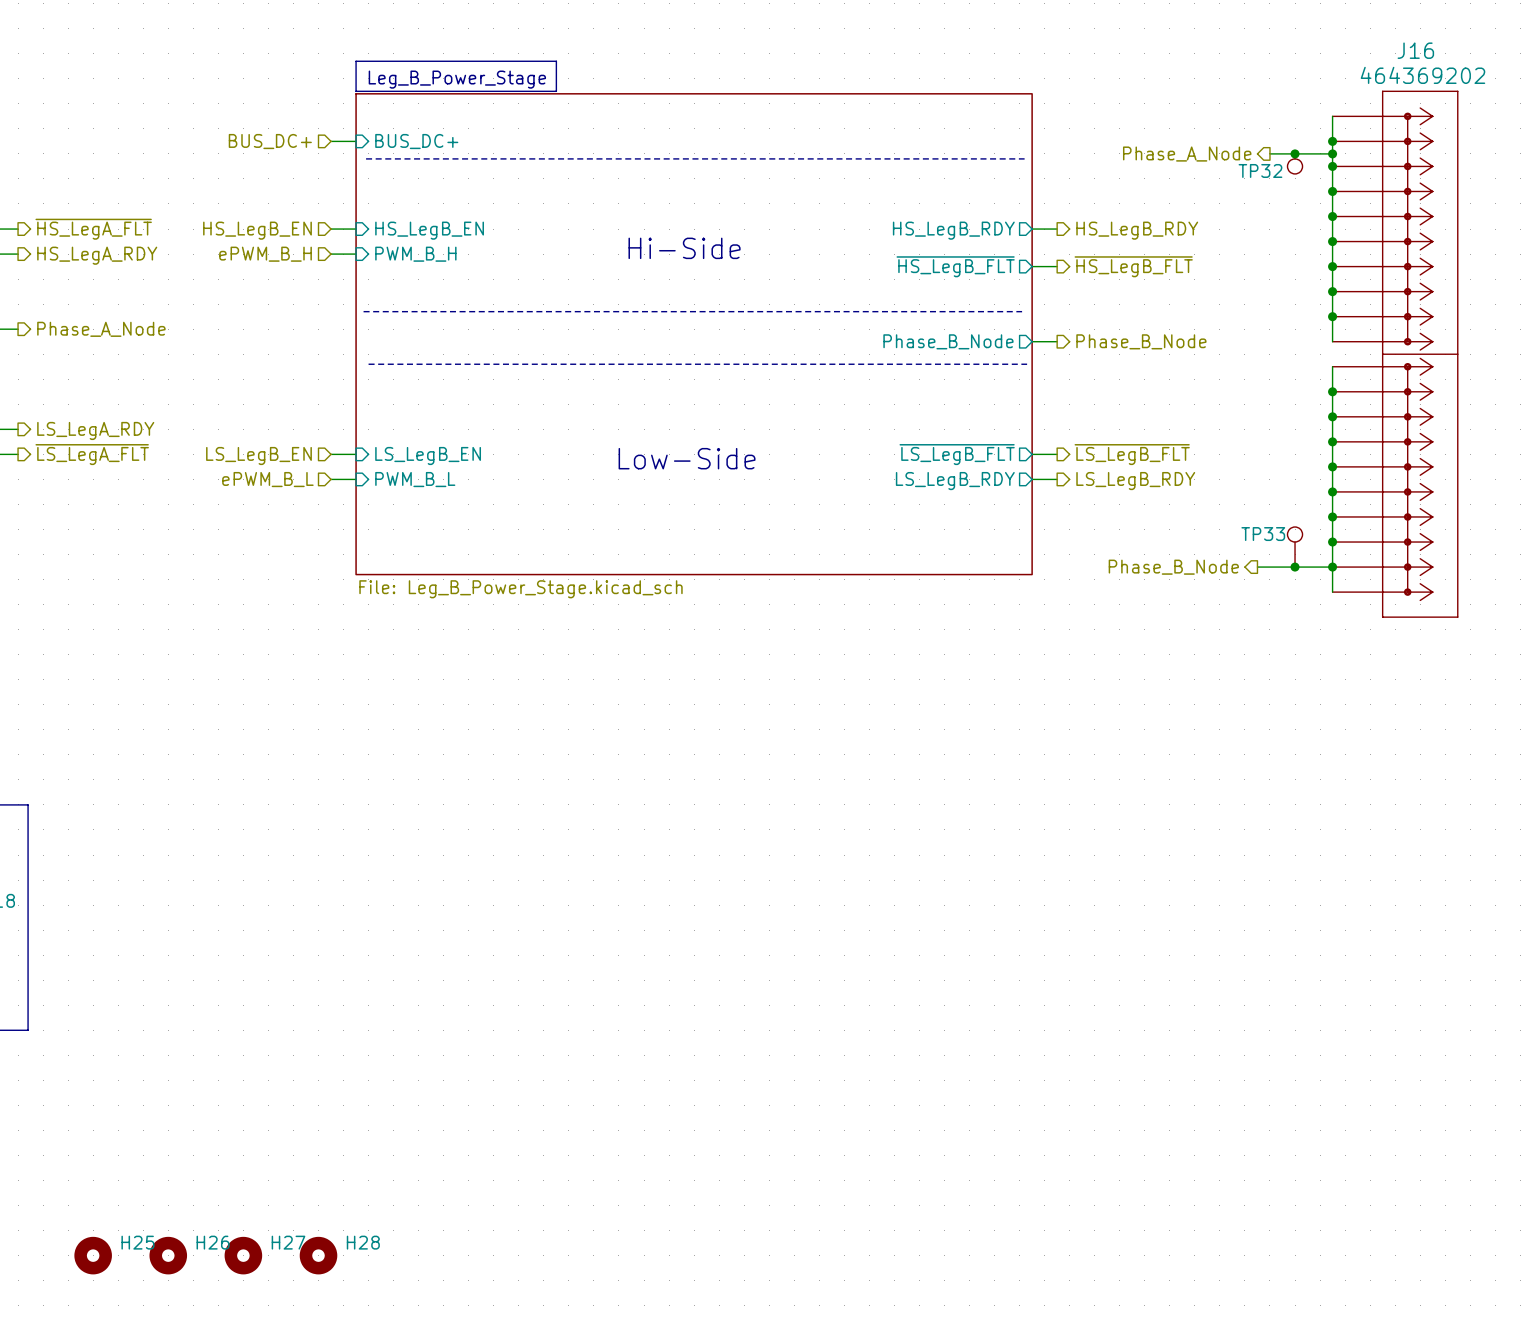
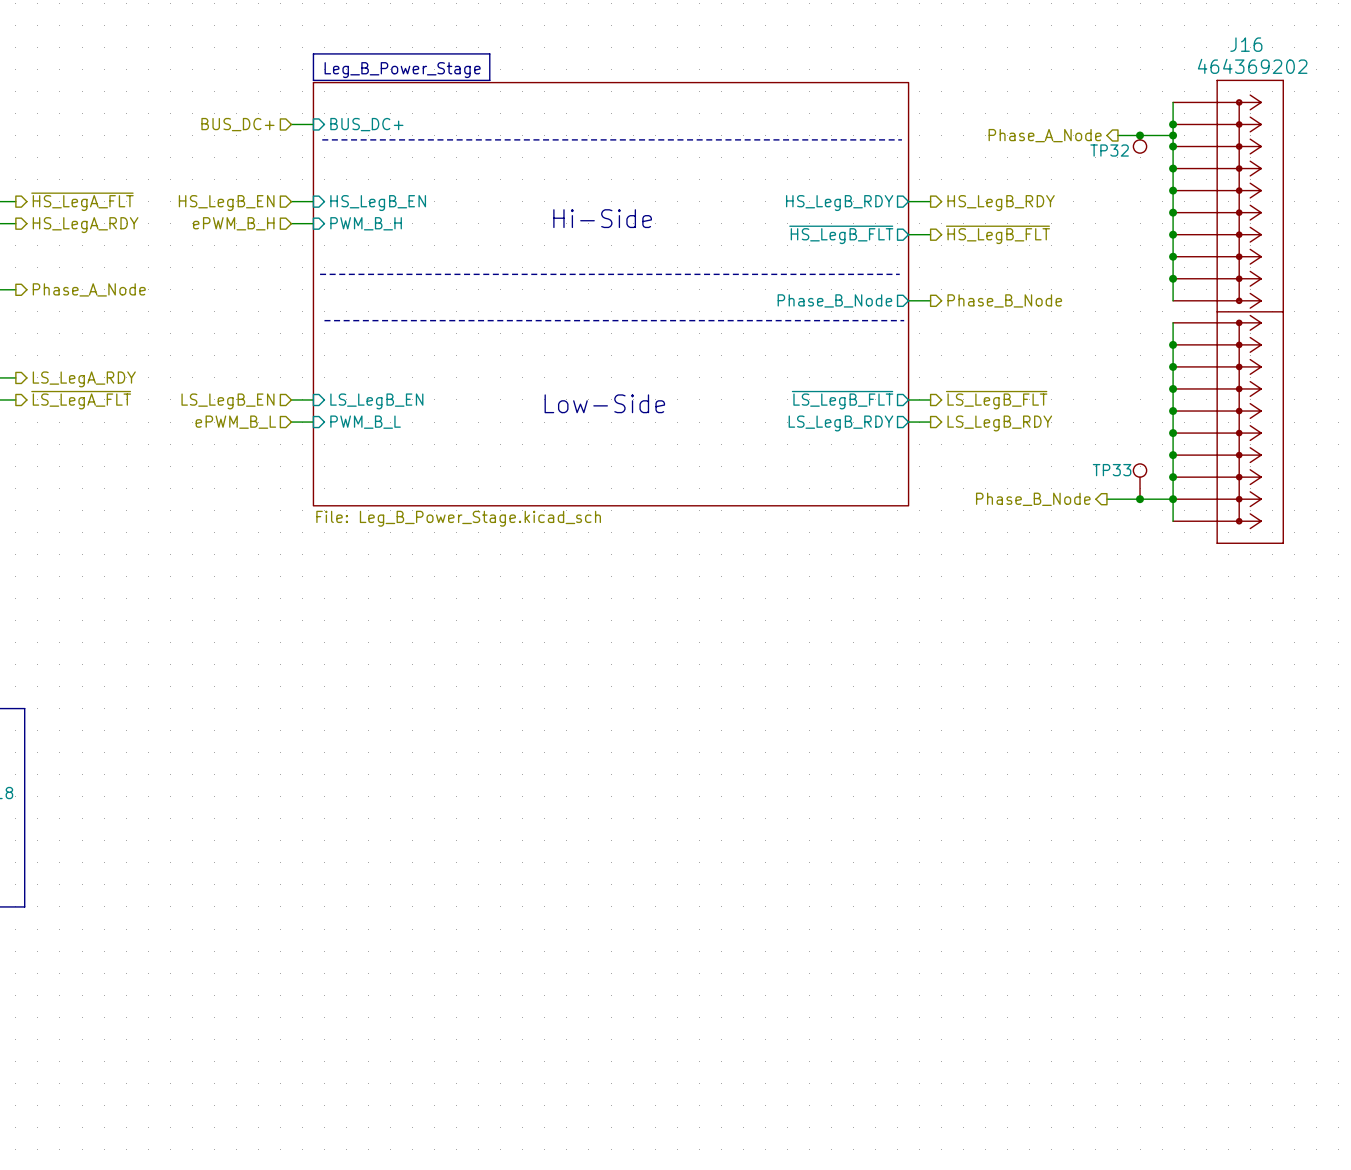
H25: (93, 1255) -> none
H26: (168, 1255) -> none
H27: (243, 1255) -> none
H28: (318, 1255) -> none

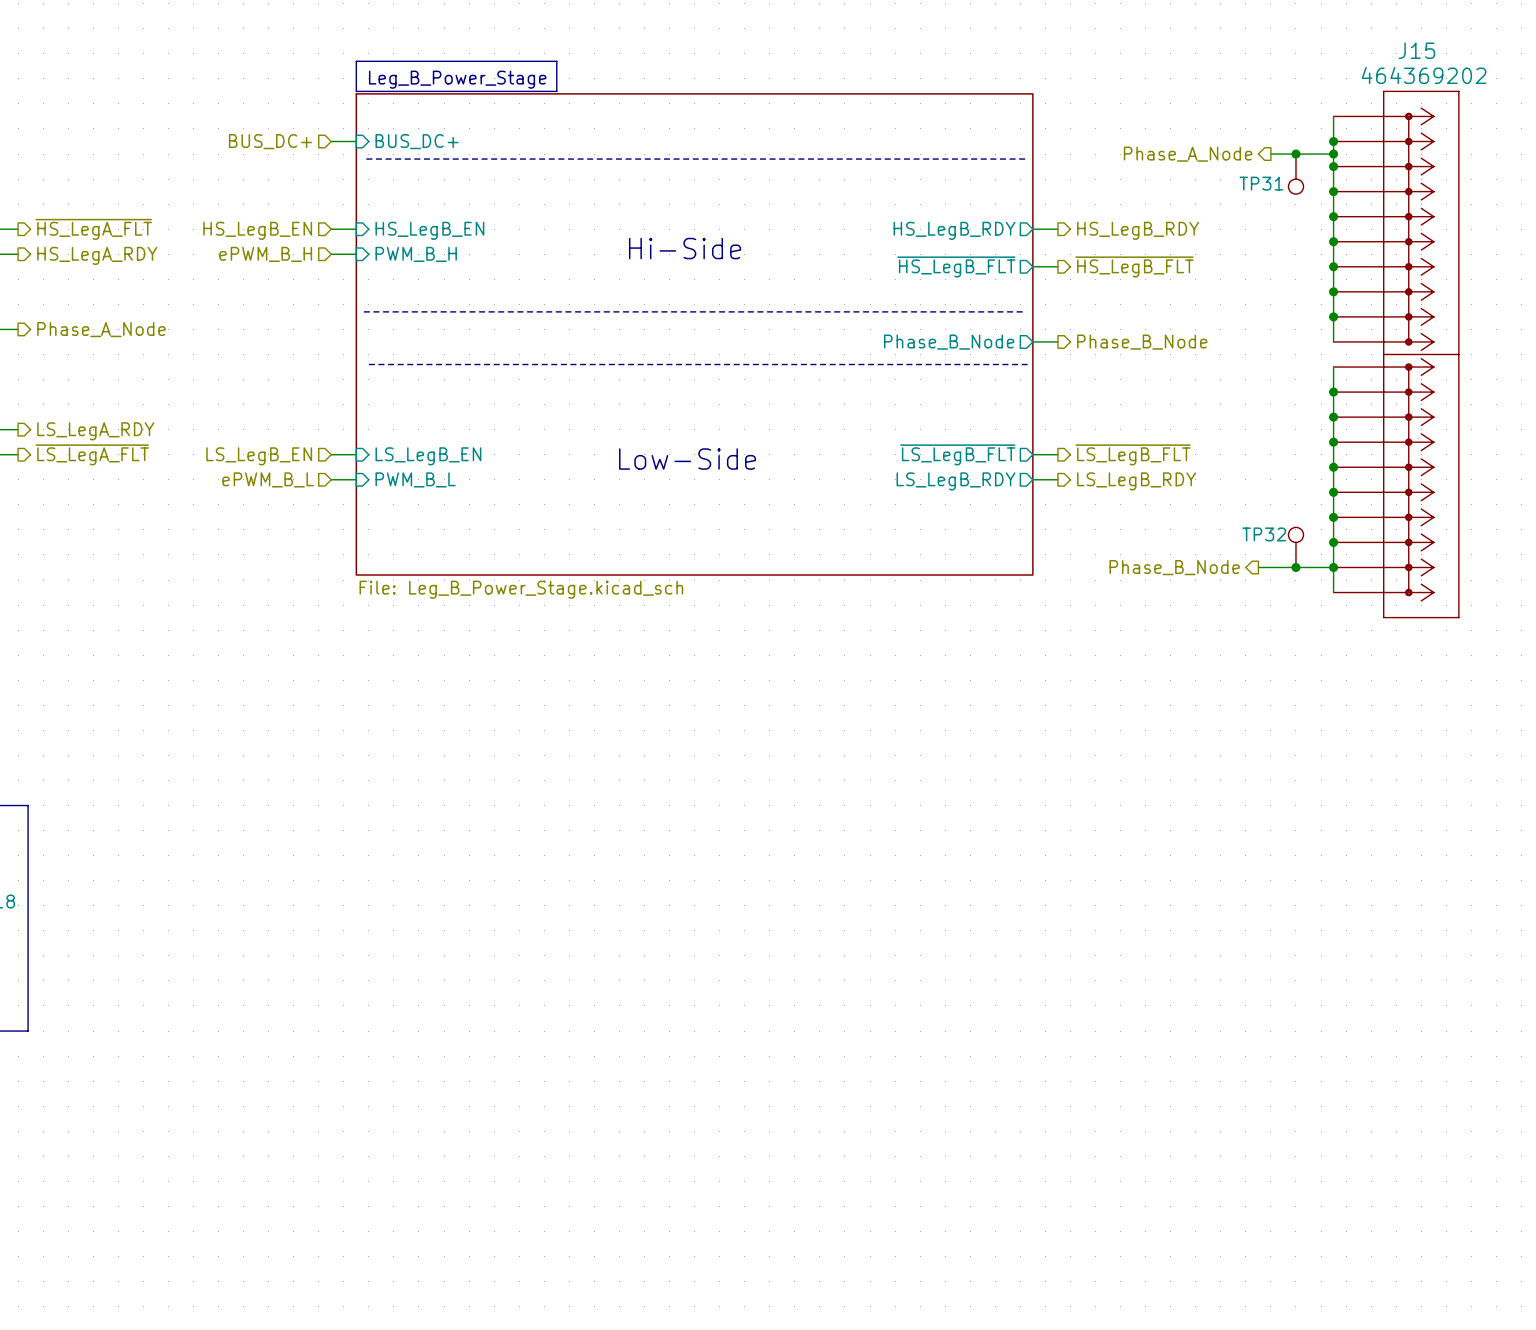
J16 name: J16 (1246, 44) -> J15 (1416, 50)
TP32: (1140, 144) -> none
TP31: none -> (1295, 174)
TP33 name: TP33 (1112, 470) -> TP32 (1264, 534)

